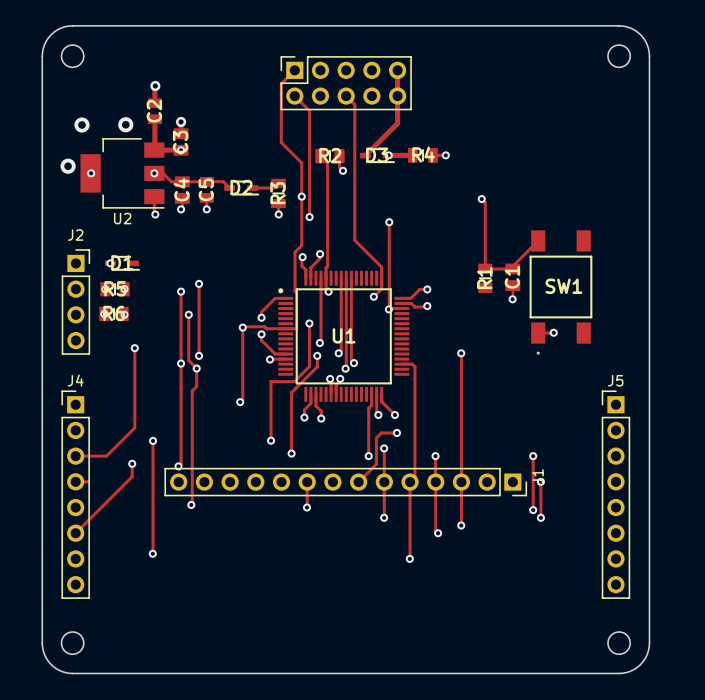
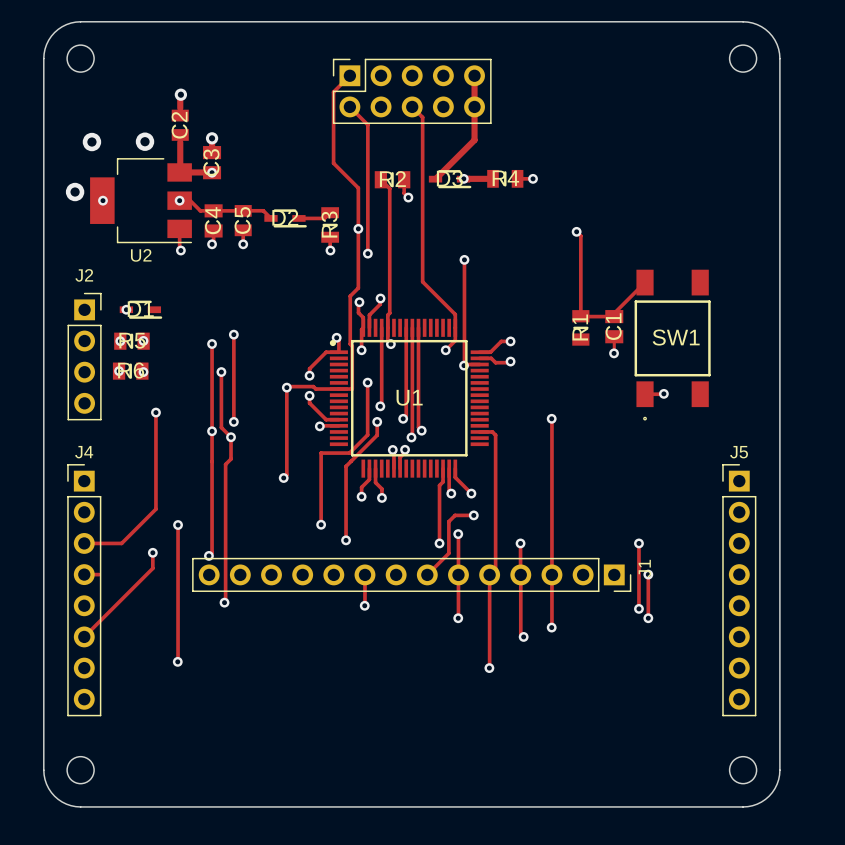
track: none -> (363, 327) (361, 329) (361, 350)
track: none -> (336, 337) (338, 339) (338, 352)
via: none -> (336, 337)
via: none -> (361, 350)

